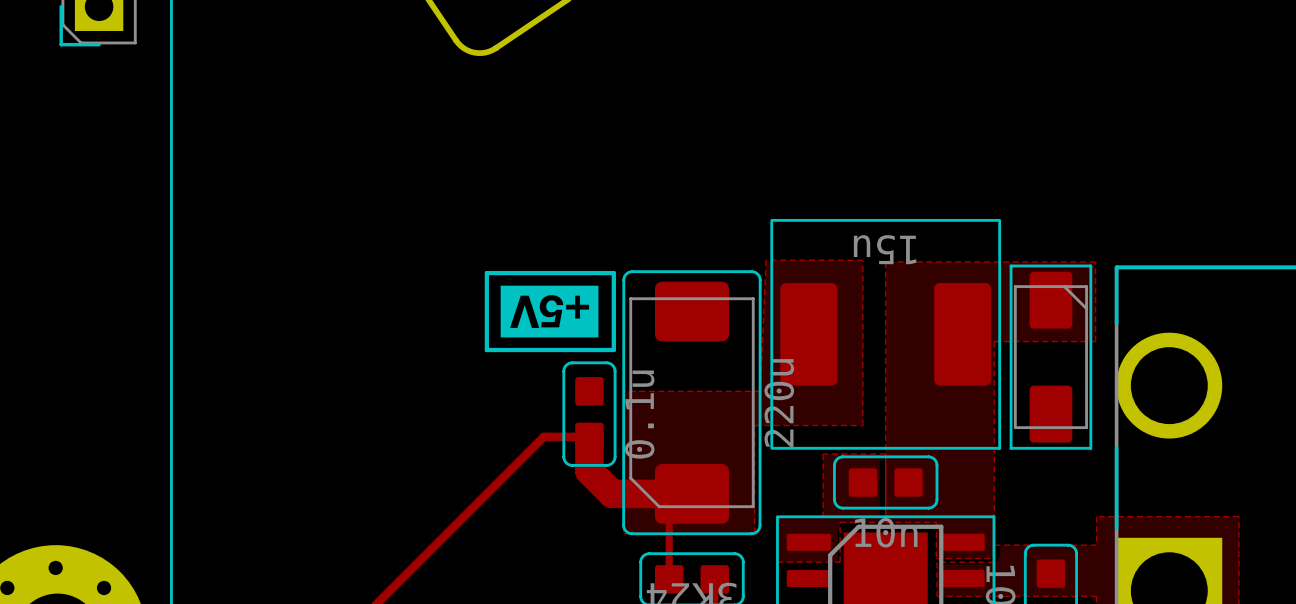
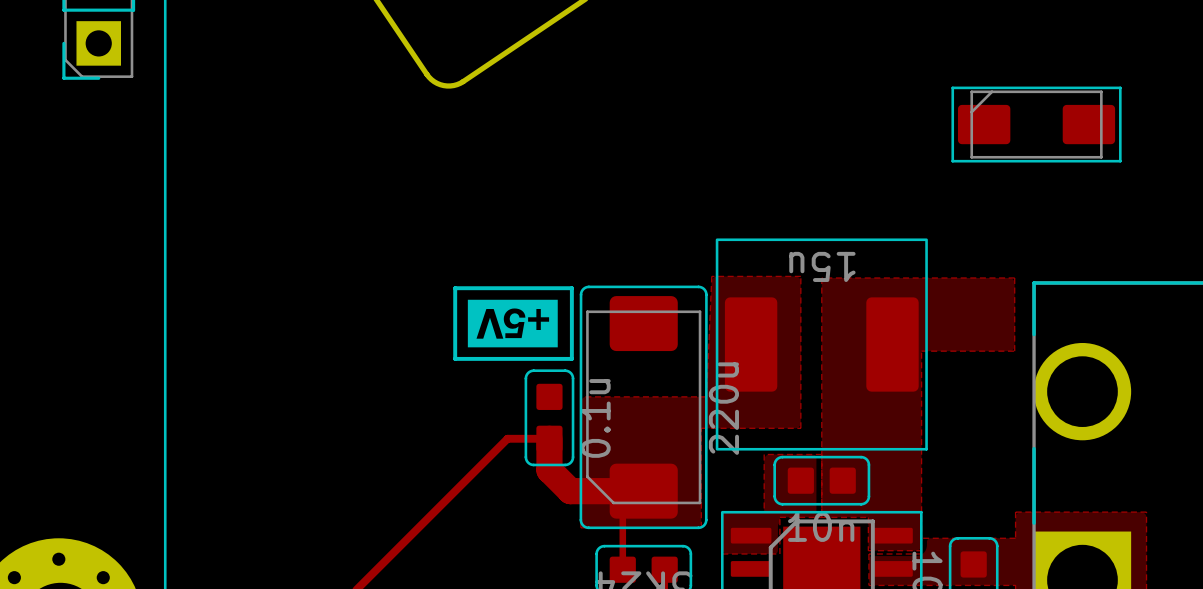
part rotation: 0° (1050, 357) -> 90° counterclockwise (1036, 124)
part position: (1050, 357) -> (1036, 124)

